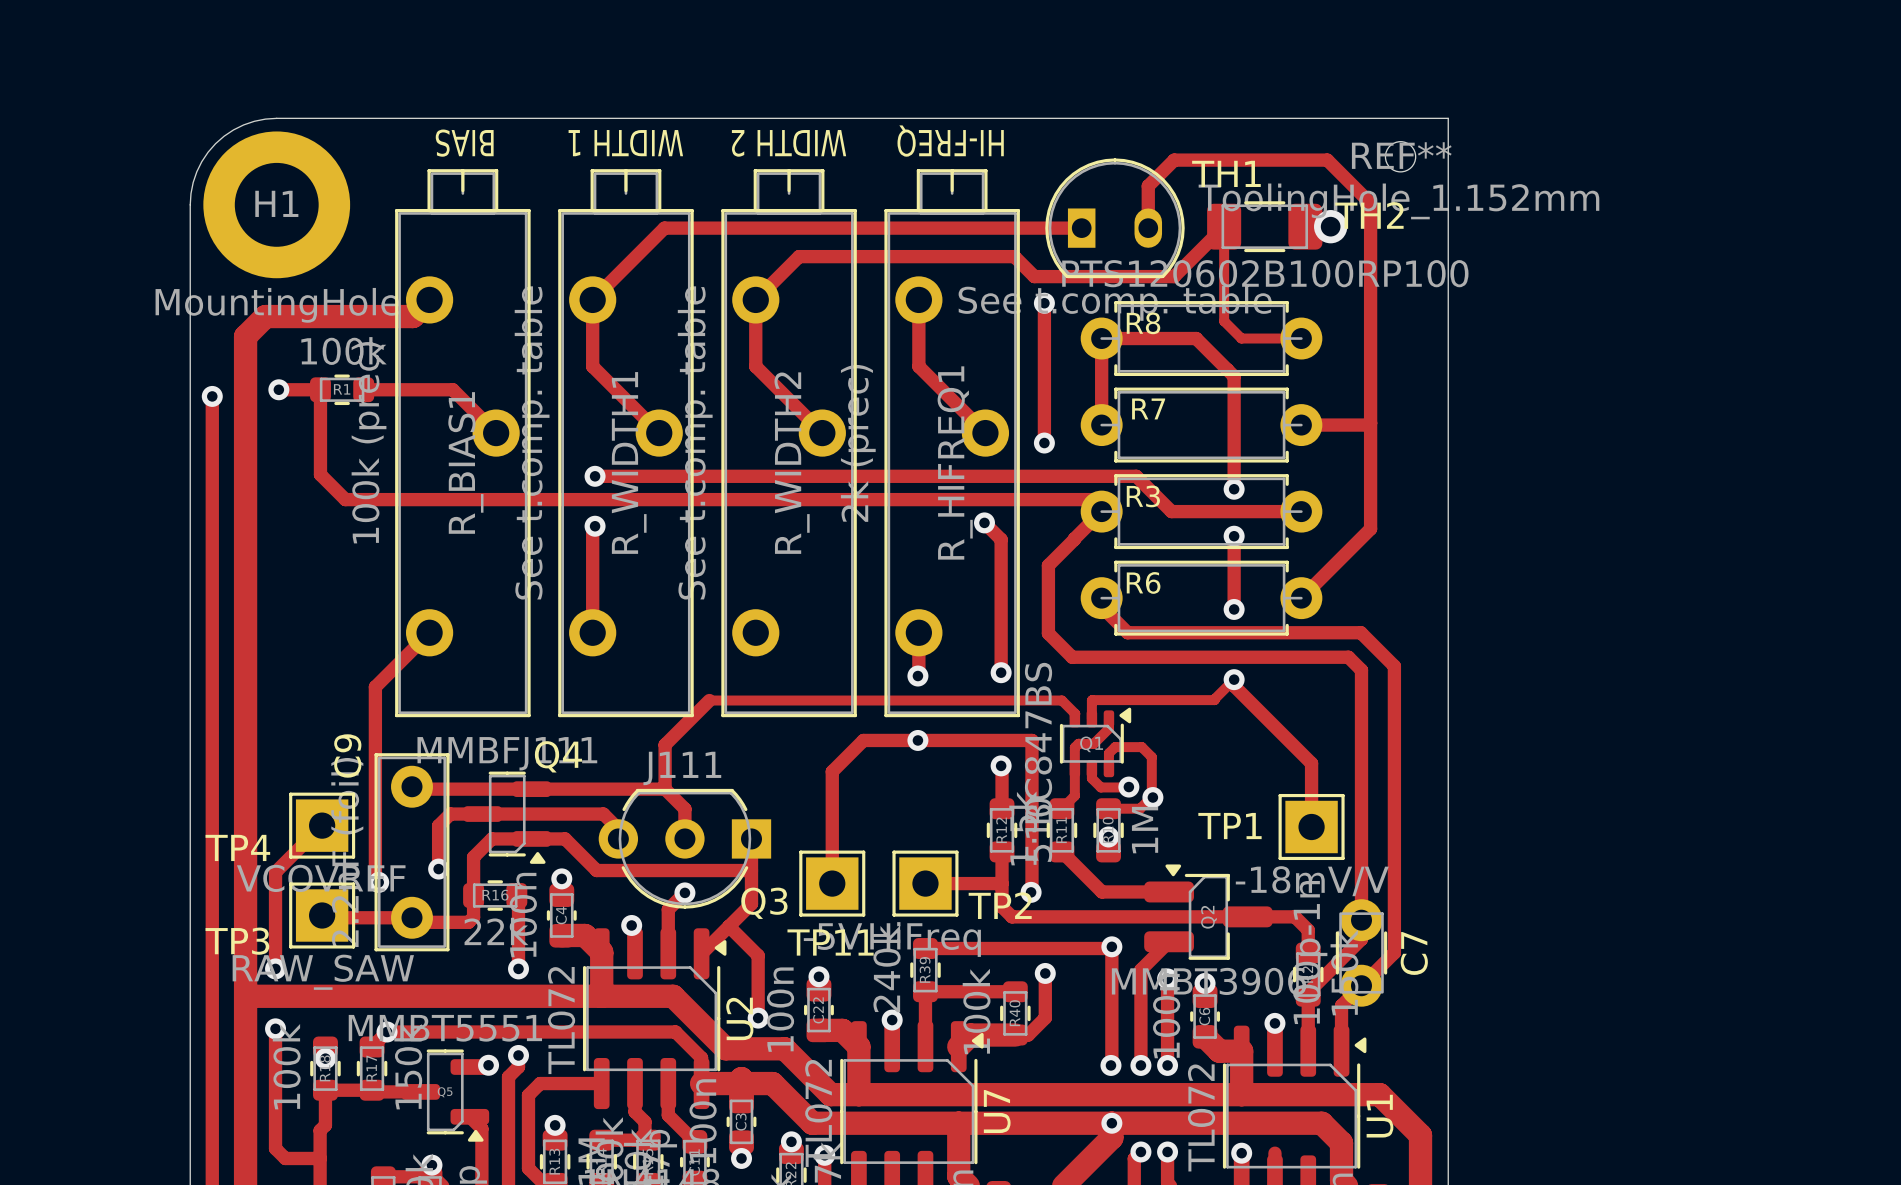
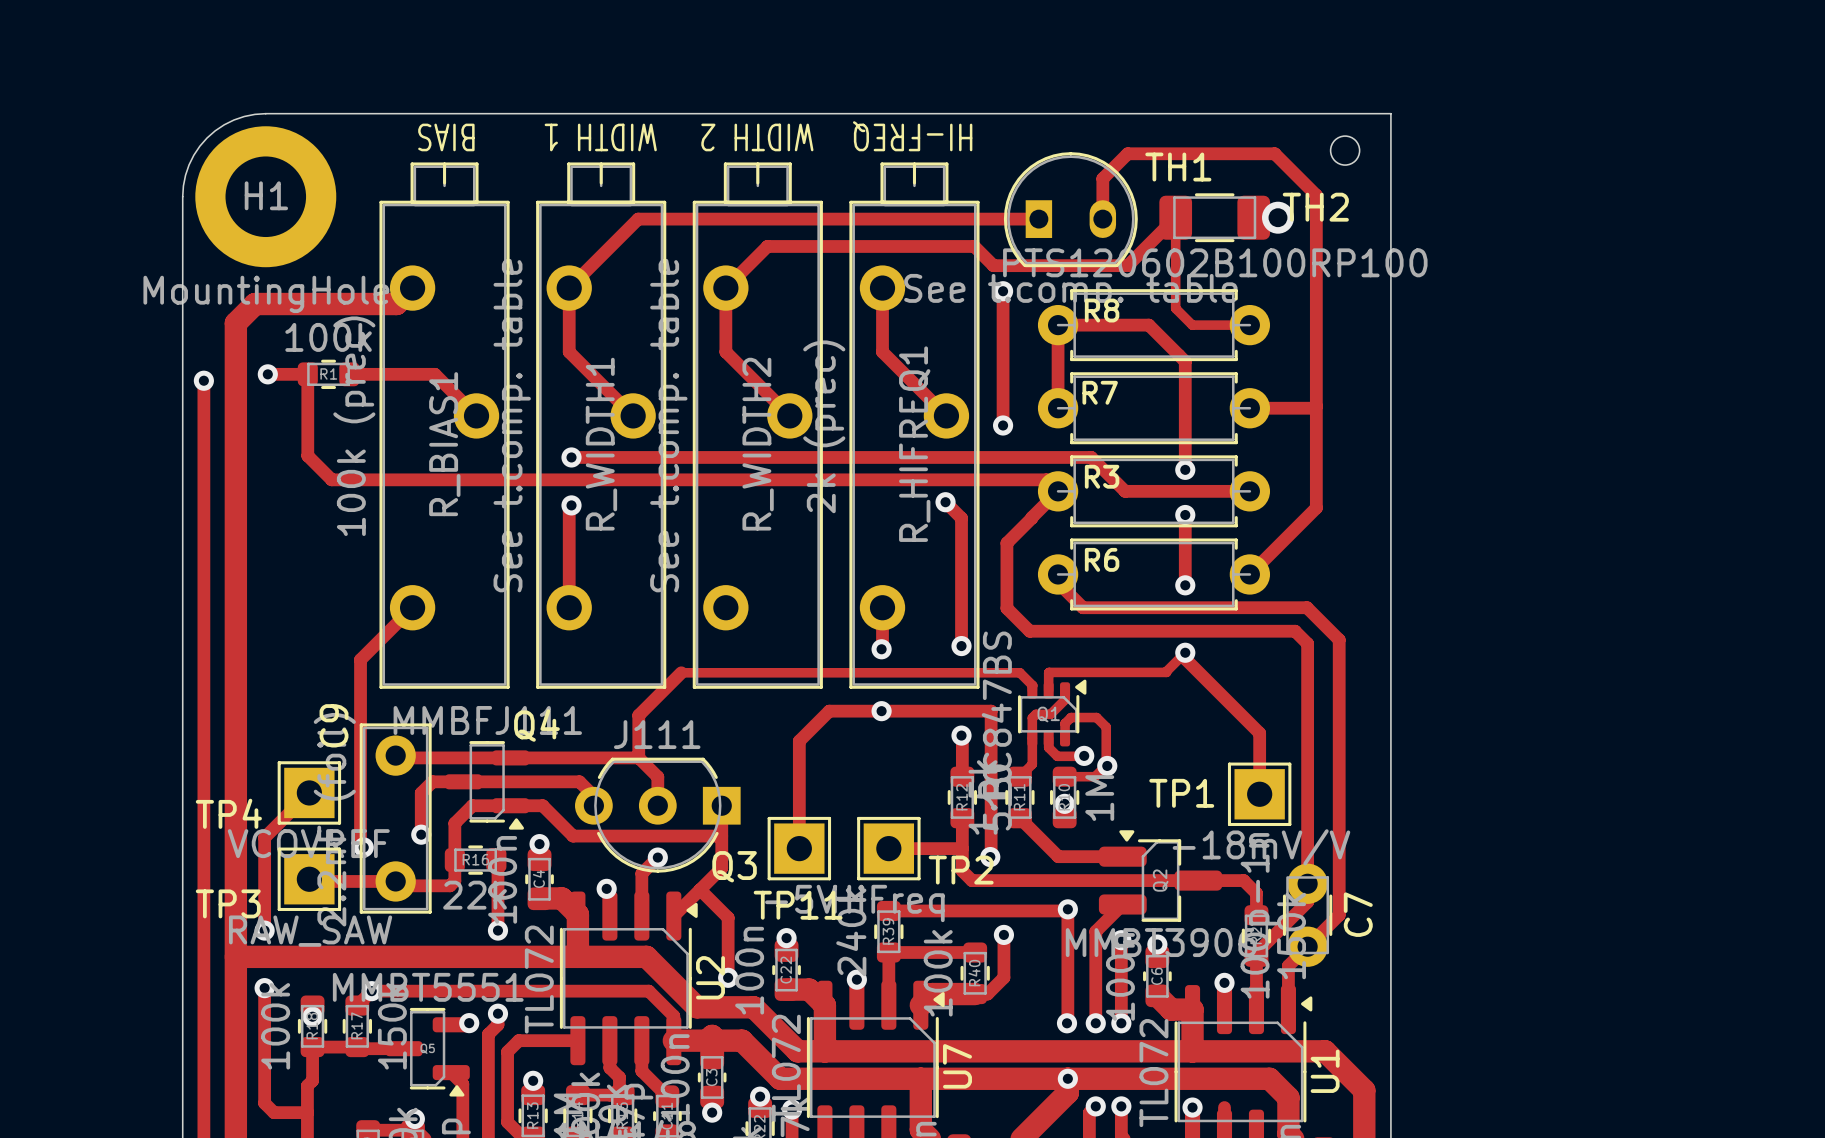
REF** name: REF** (1401, 155) -> none
REF** value: ToolingHole_1.152mm (1398, 201) -> none

